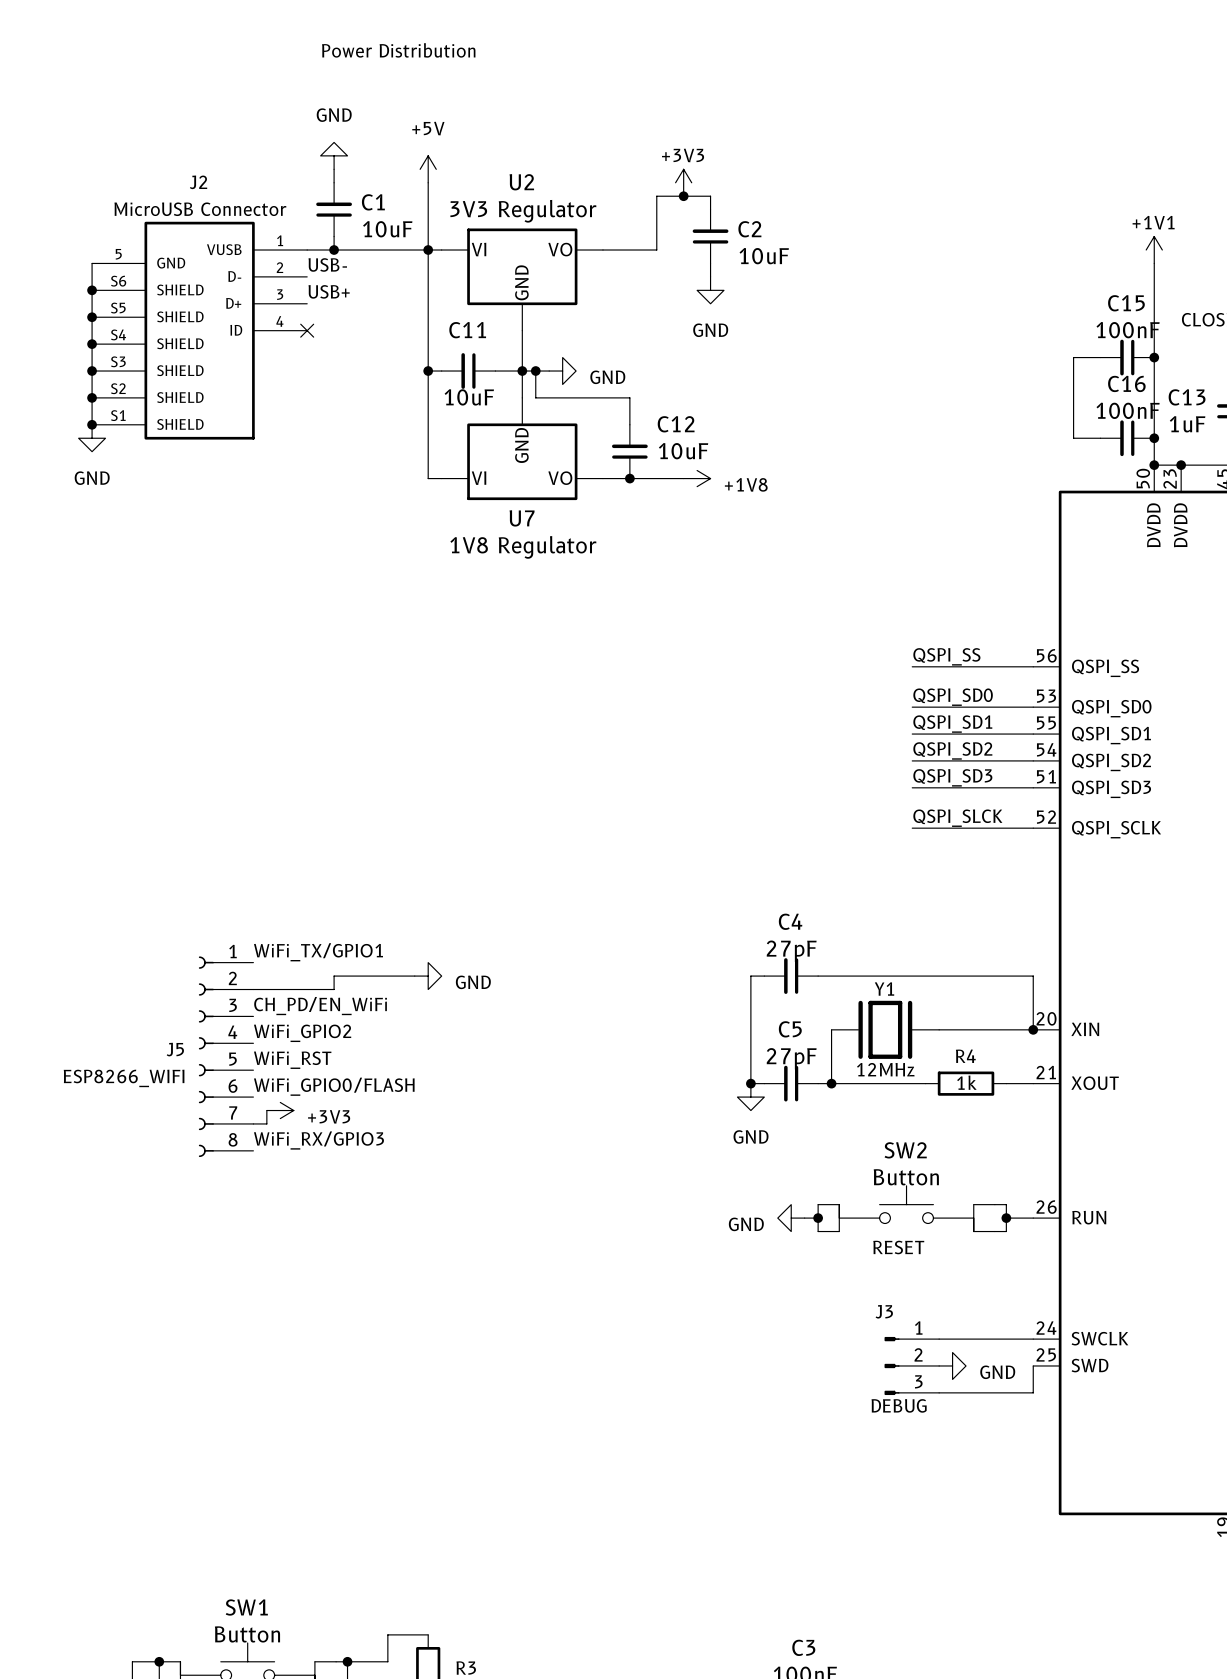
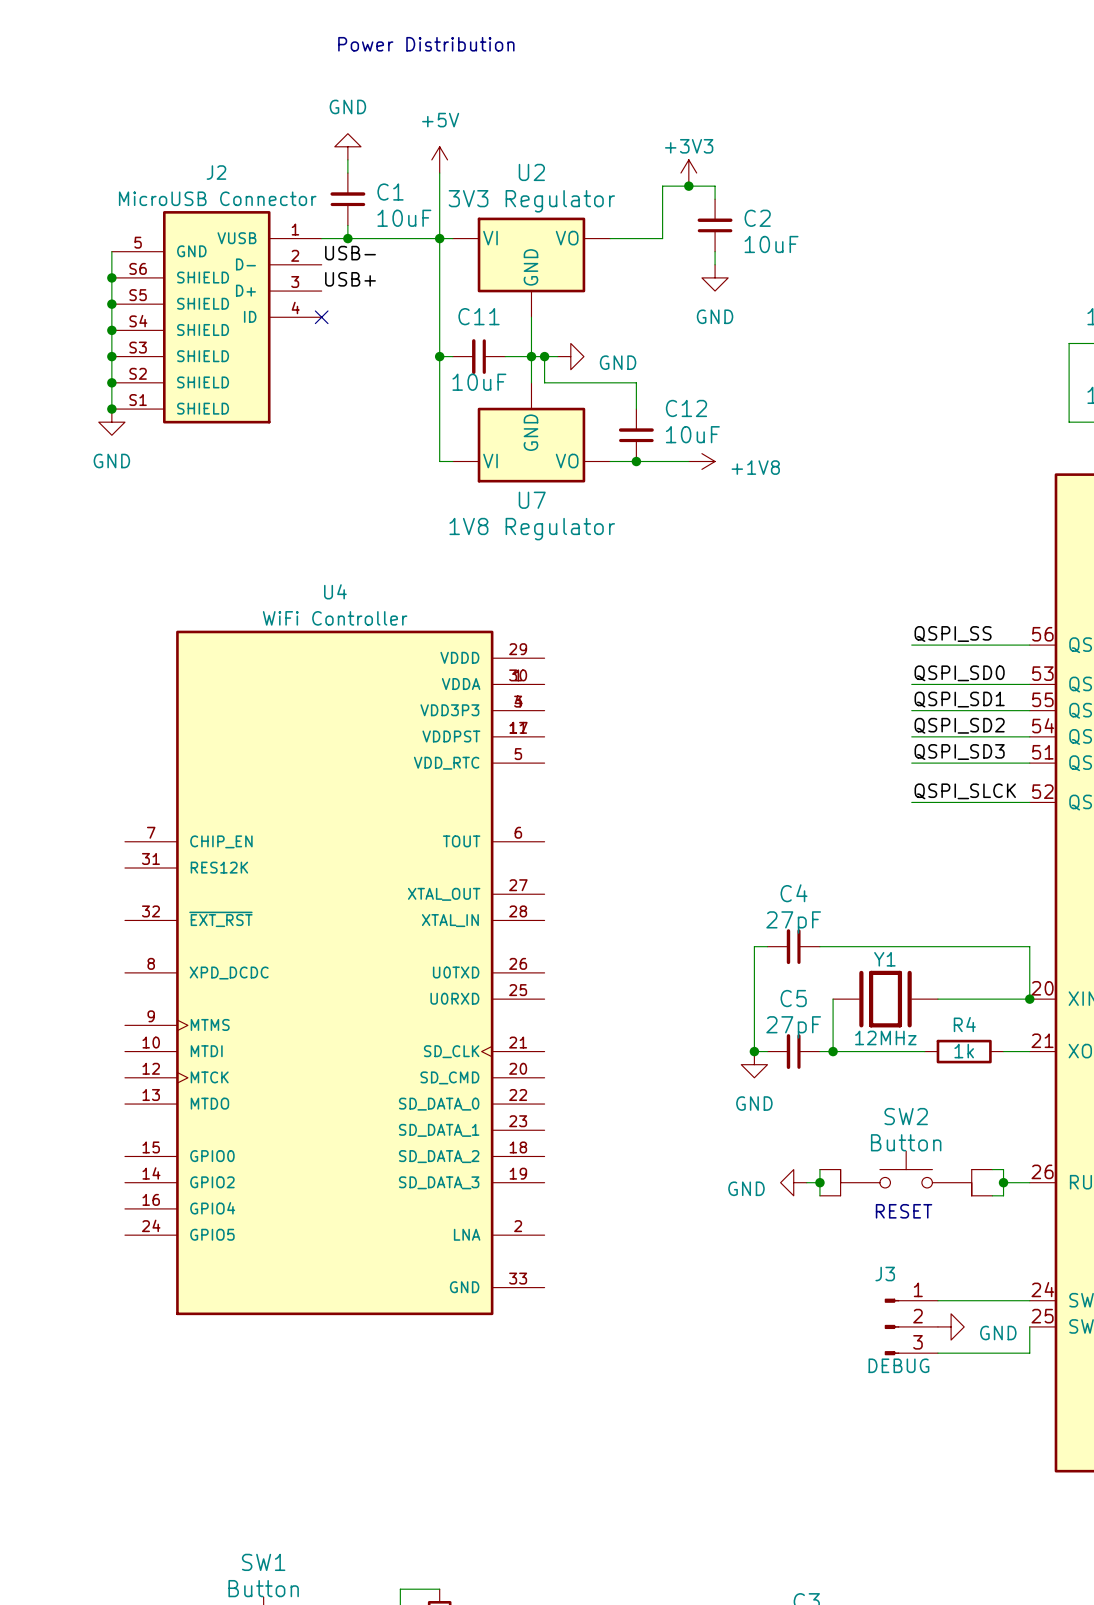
label: WiFi_TX/GPIO1 (318, 952) -> none
power symbol: GND (428, 976) -> none
U4: none -> WiFi Controller (334, 972)
label: CH_PD/EN_WiFi (320, 1006) -> none
label: WiFi_GPIO2 (302, 1033) -> none
J5: ESP8266_WIFI (226, 1056) -> none
label: WiFi_RST (292, 1060) -> none
label: WiFi_GPIO0/FLASH (334, 1086) -> none
power symbol: +3V3 (280, 1110) -> none
label: WiFi_RX/GPIO3 (318, 1140) -> none

